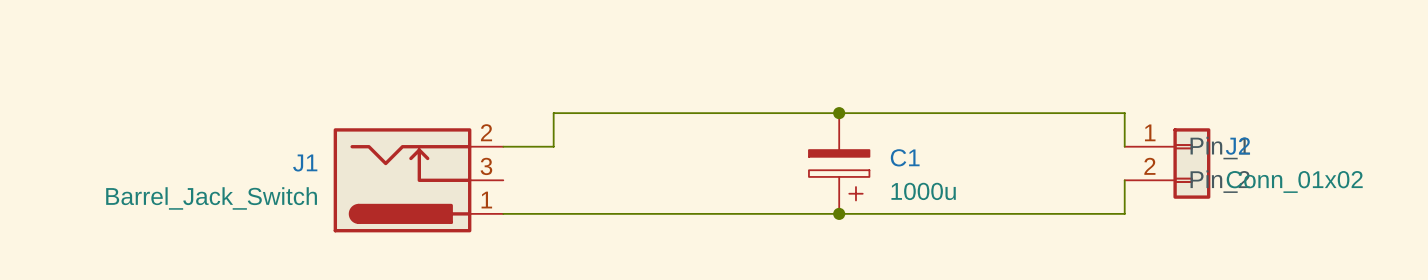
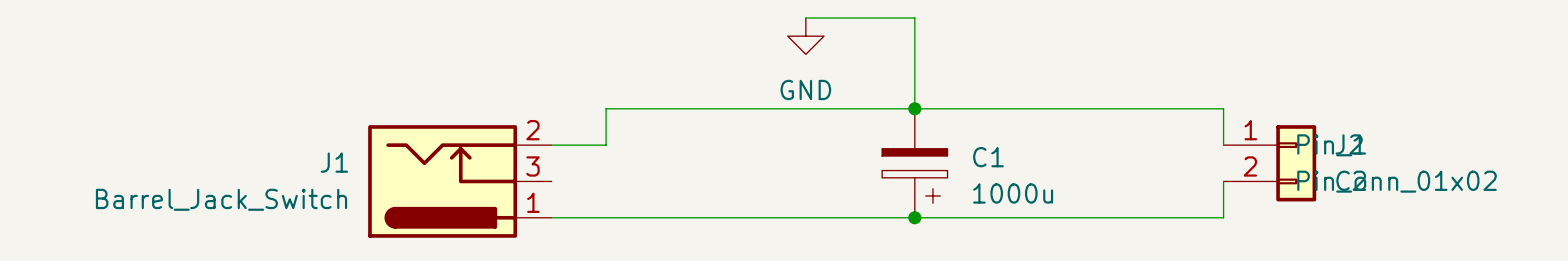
wire: none -> (805, 18) (914, 18) (914, 108)
power symbol: none -> GND (805, 36)

